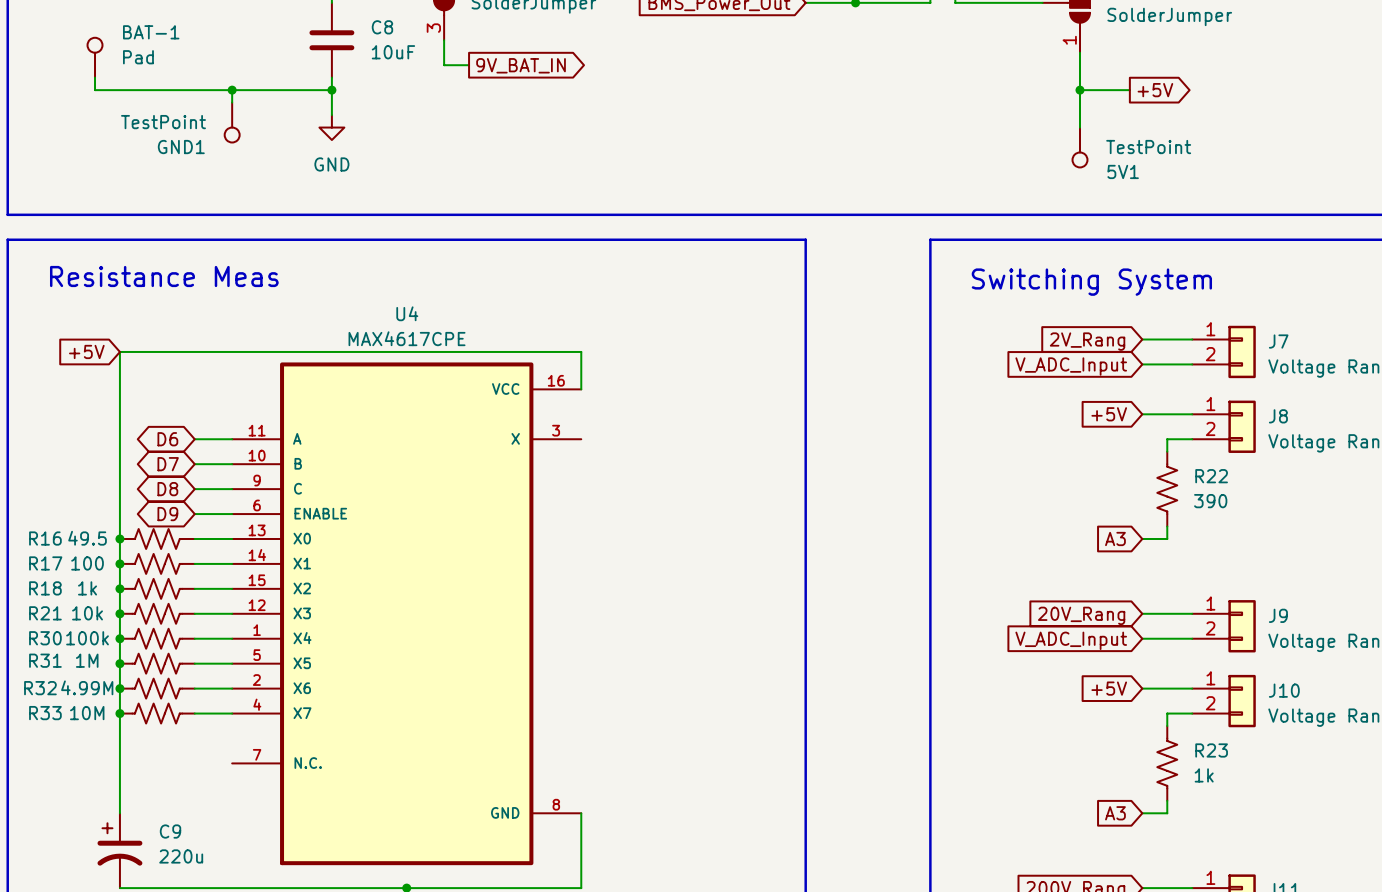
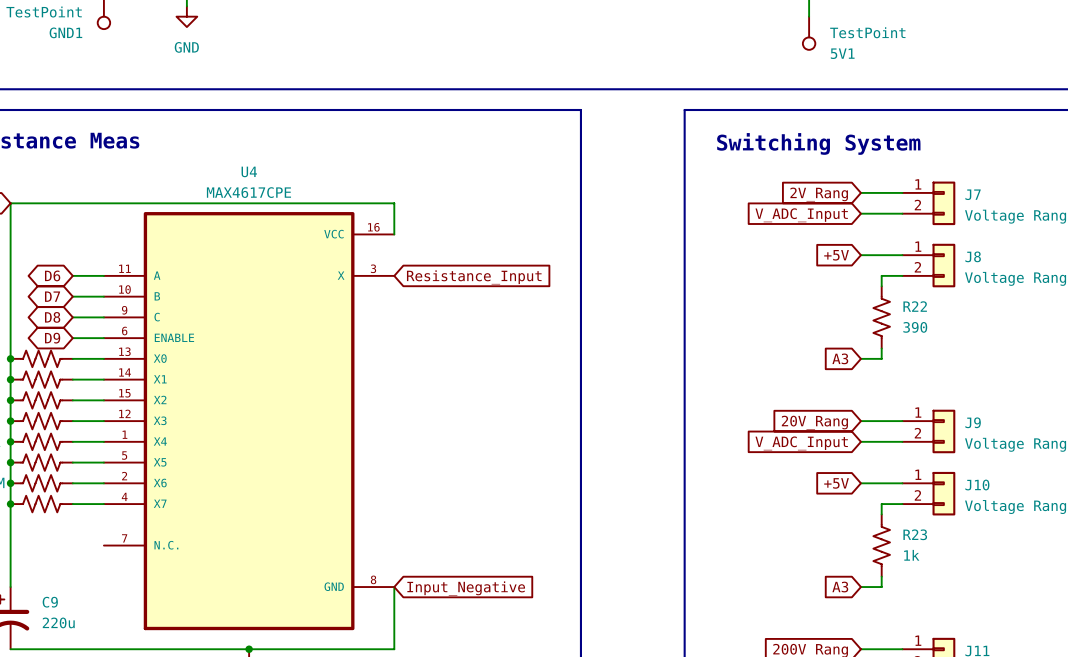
global label: none -> Resistance_Input (474, 277)
global label: none -> Input_Negative (466, 588)

